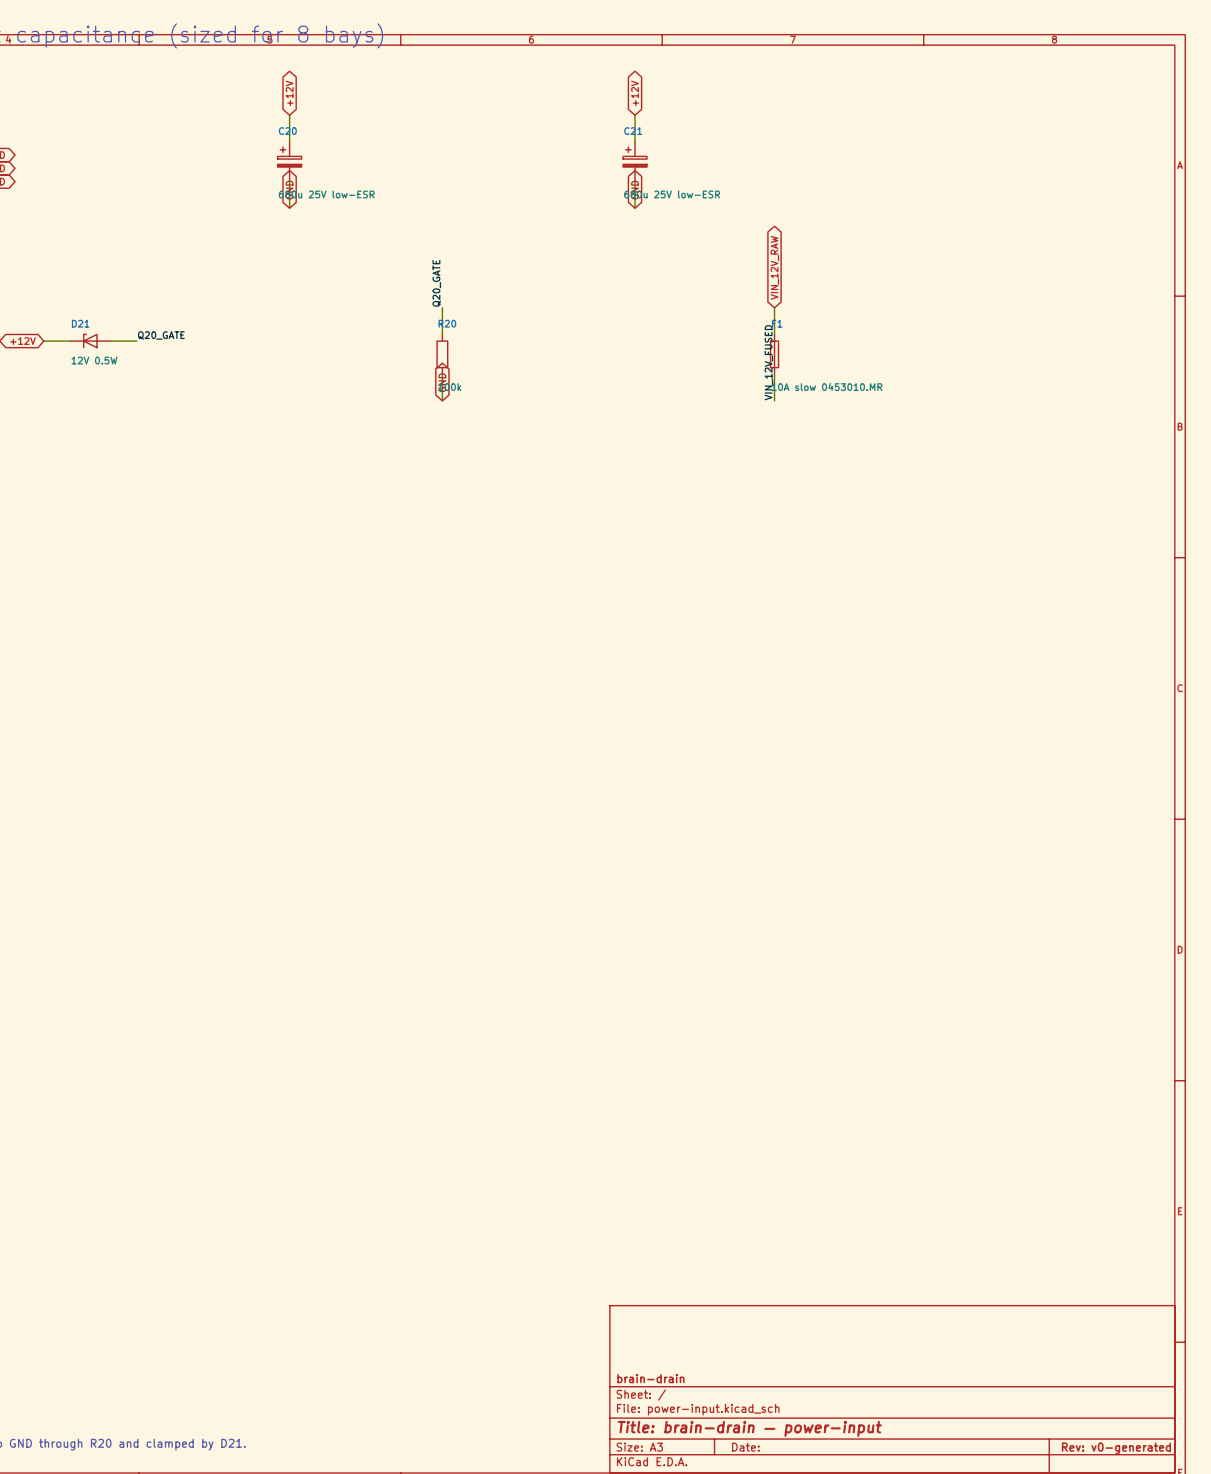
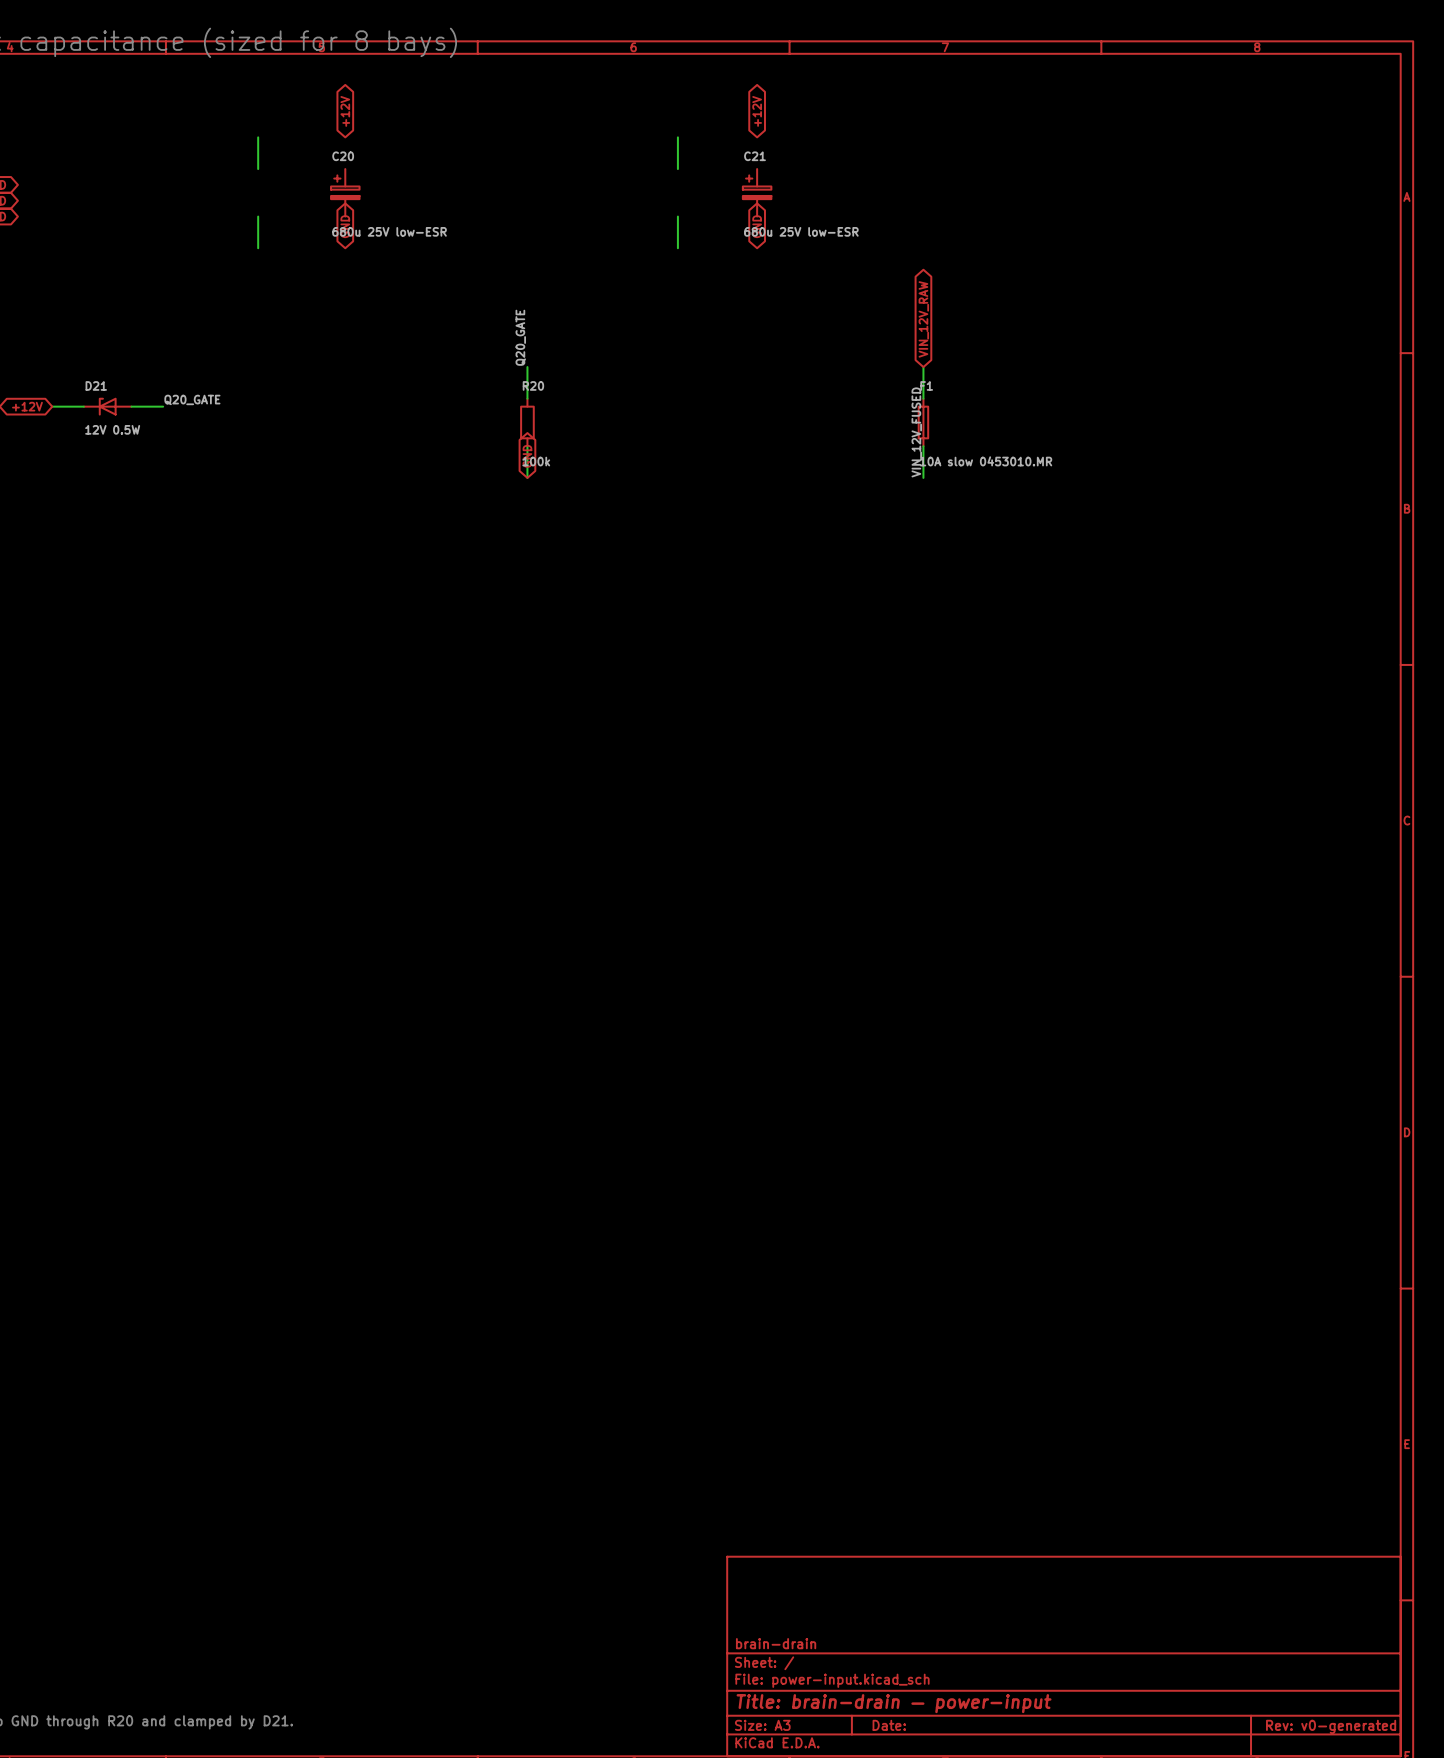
wire: (289, 115) (289, 141) -> (258, 137) (258, 169)
wire: (635, 115) (635, 141) -> (677, 137) (677, 169)
wire: (289, 181) (289, 208) -> (258, 216) (258, 248)
wire: (635, 181) (635, 208) -> (677, 216) (677, 248)

